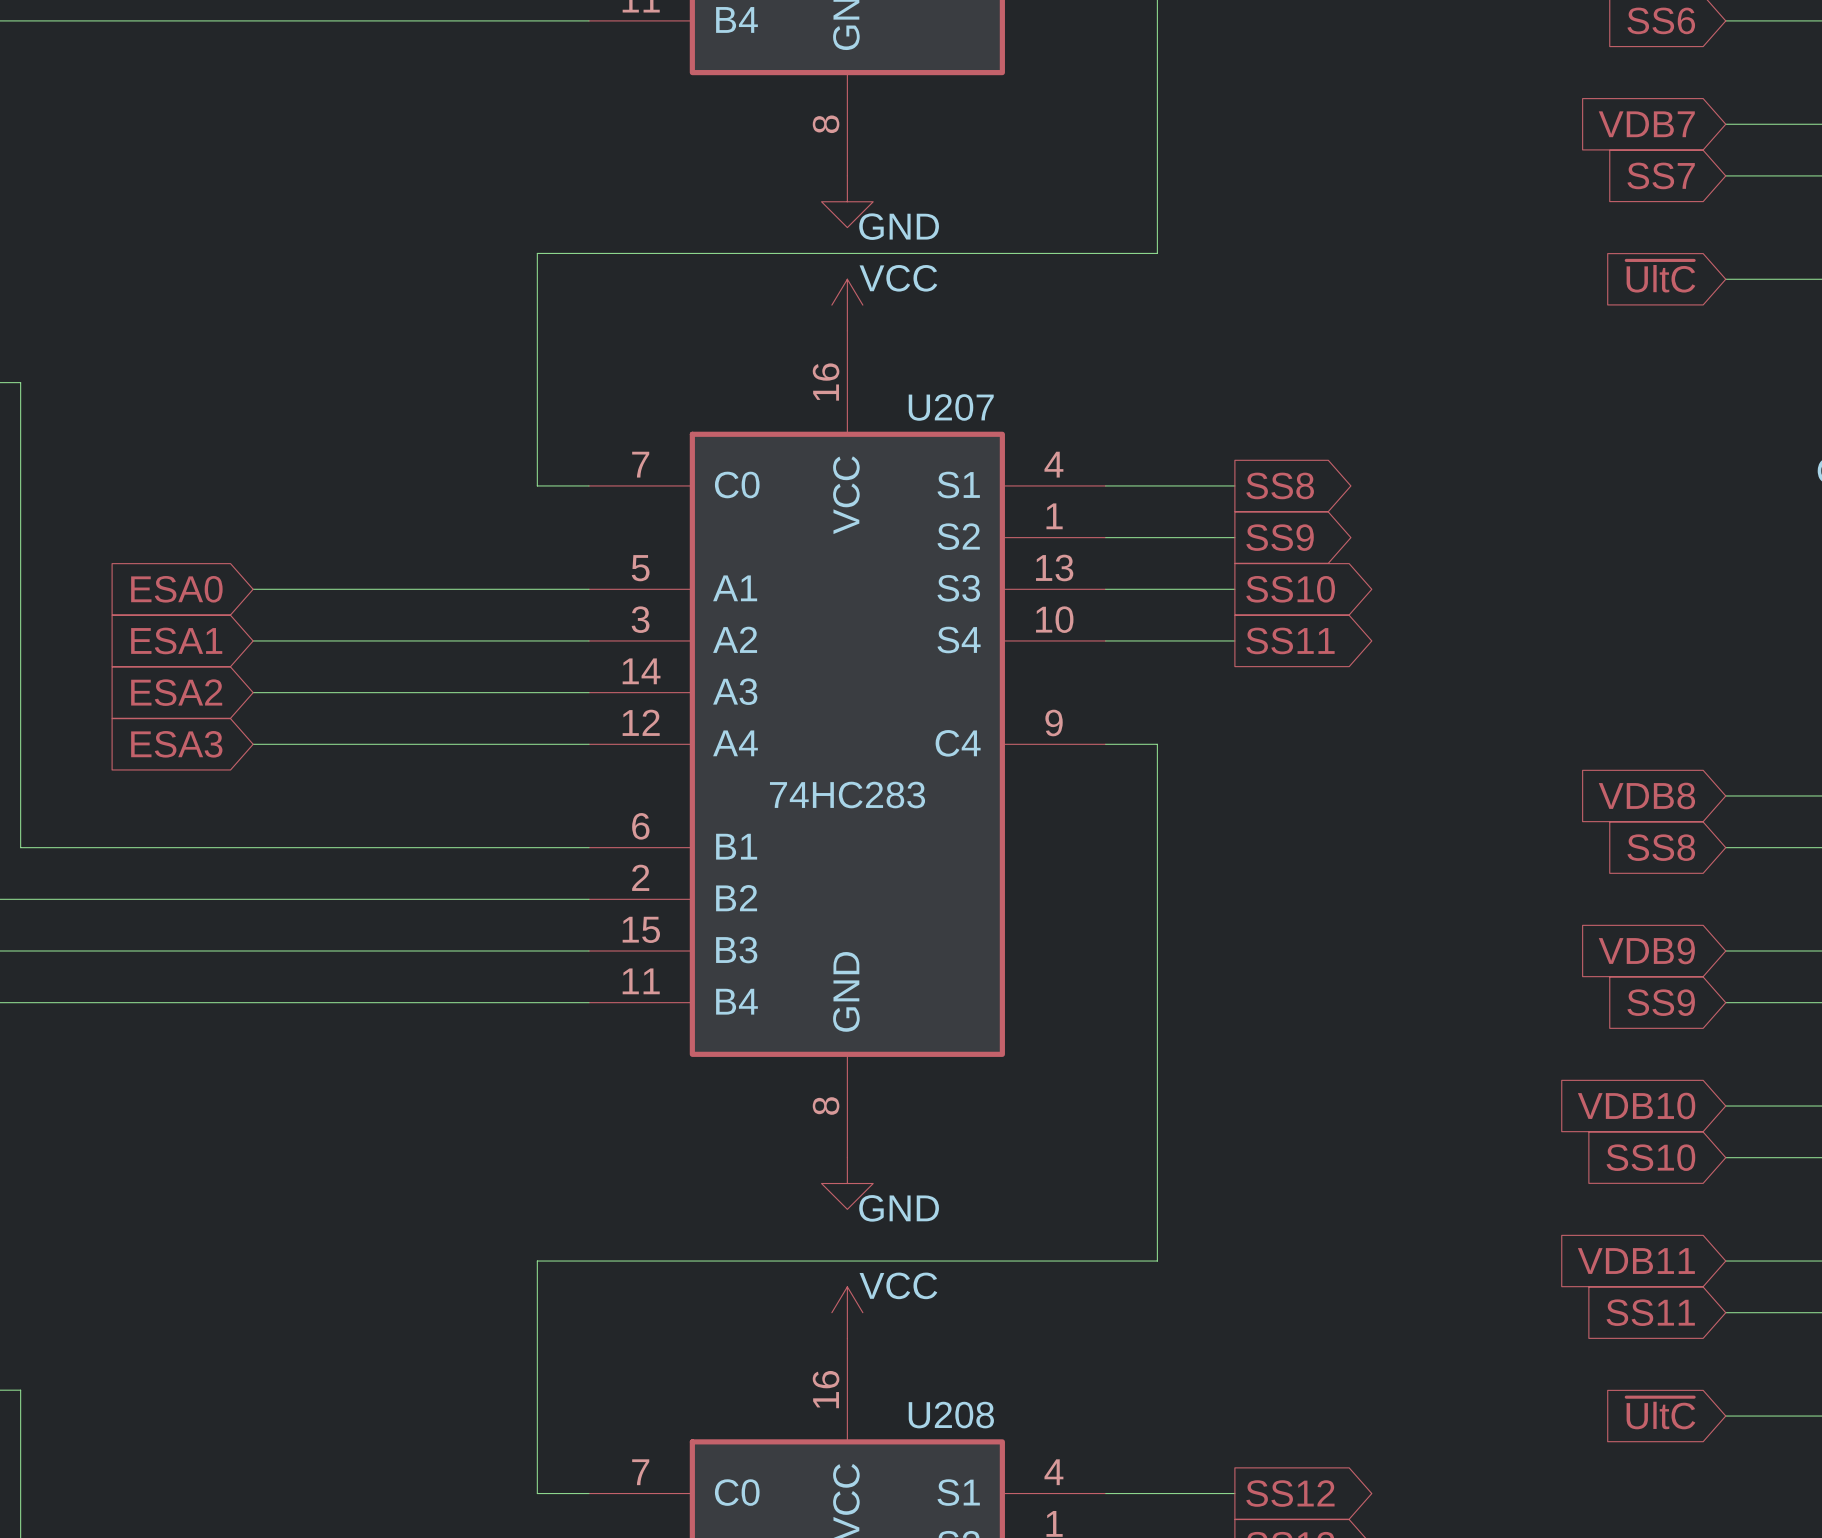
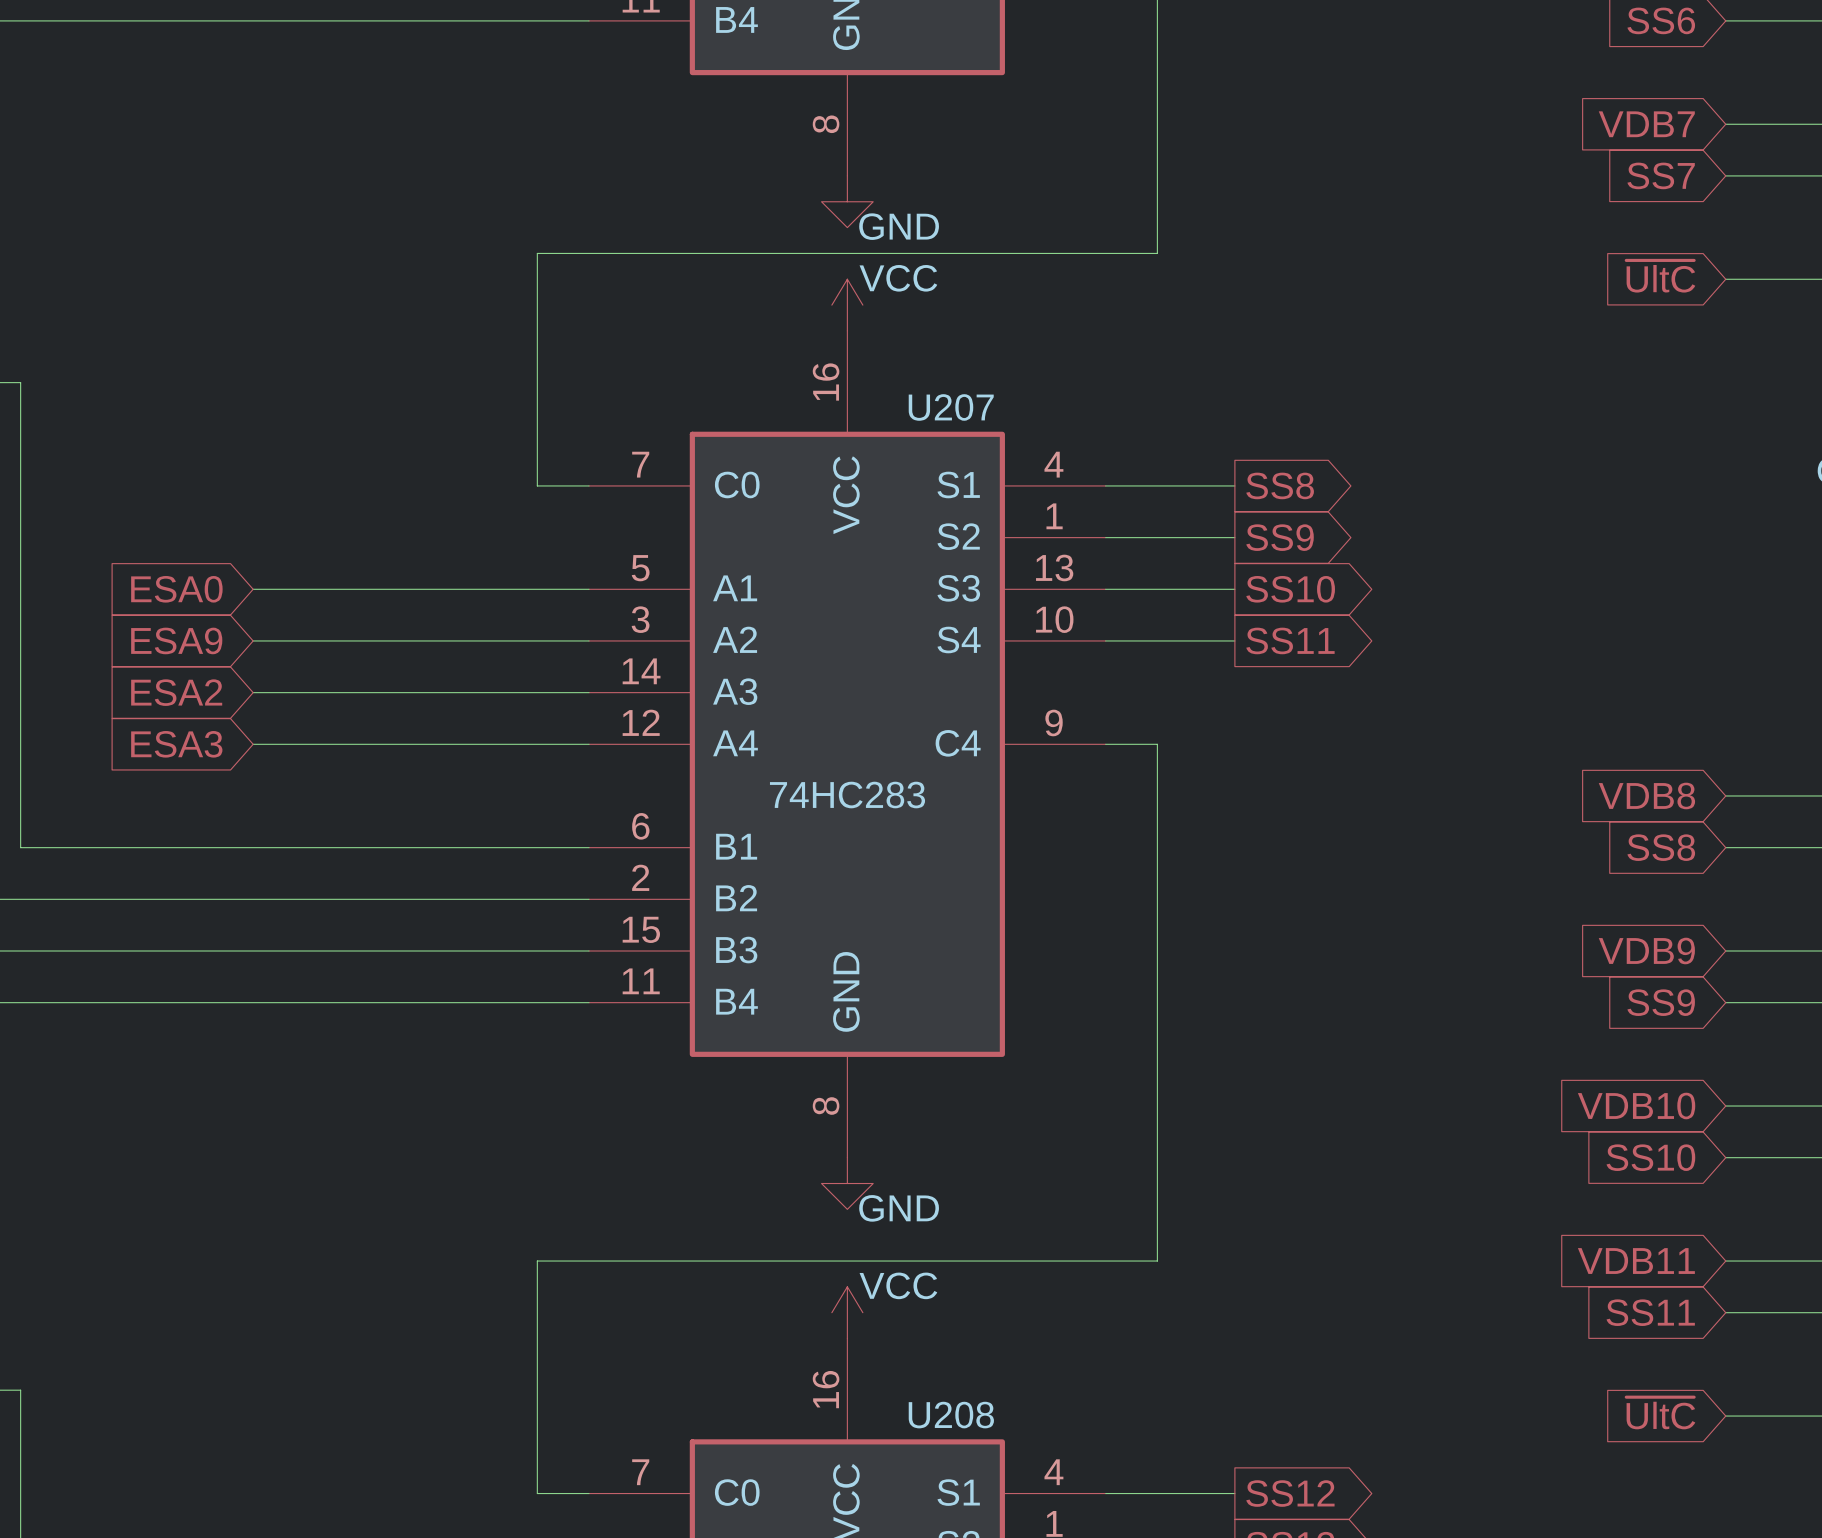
global label: ESA1 (176, 640) -> ESA9 (176, 640)

